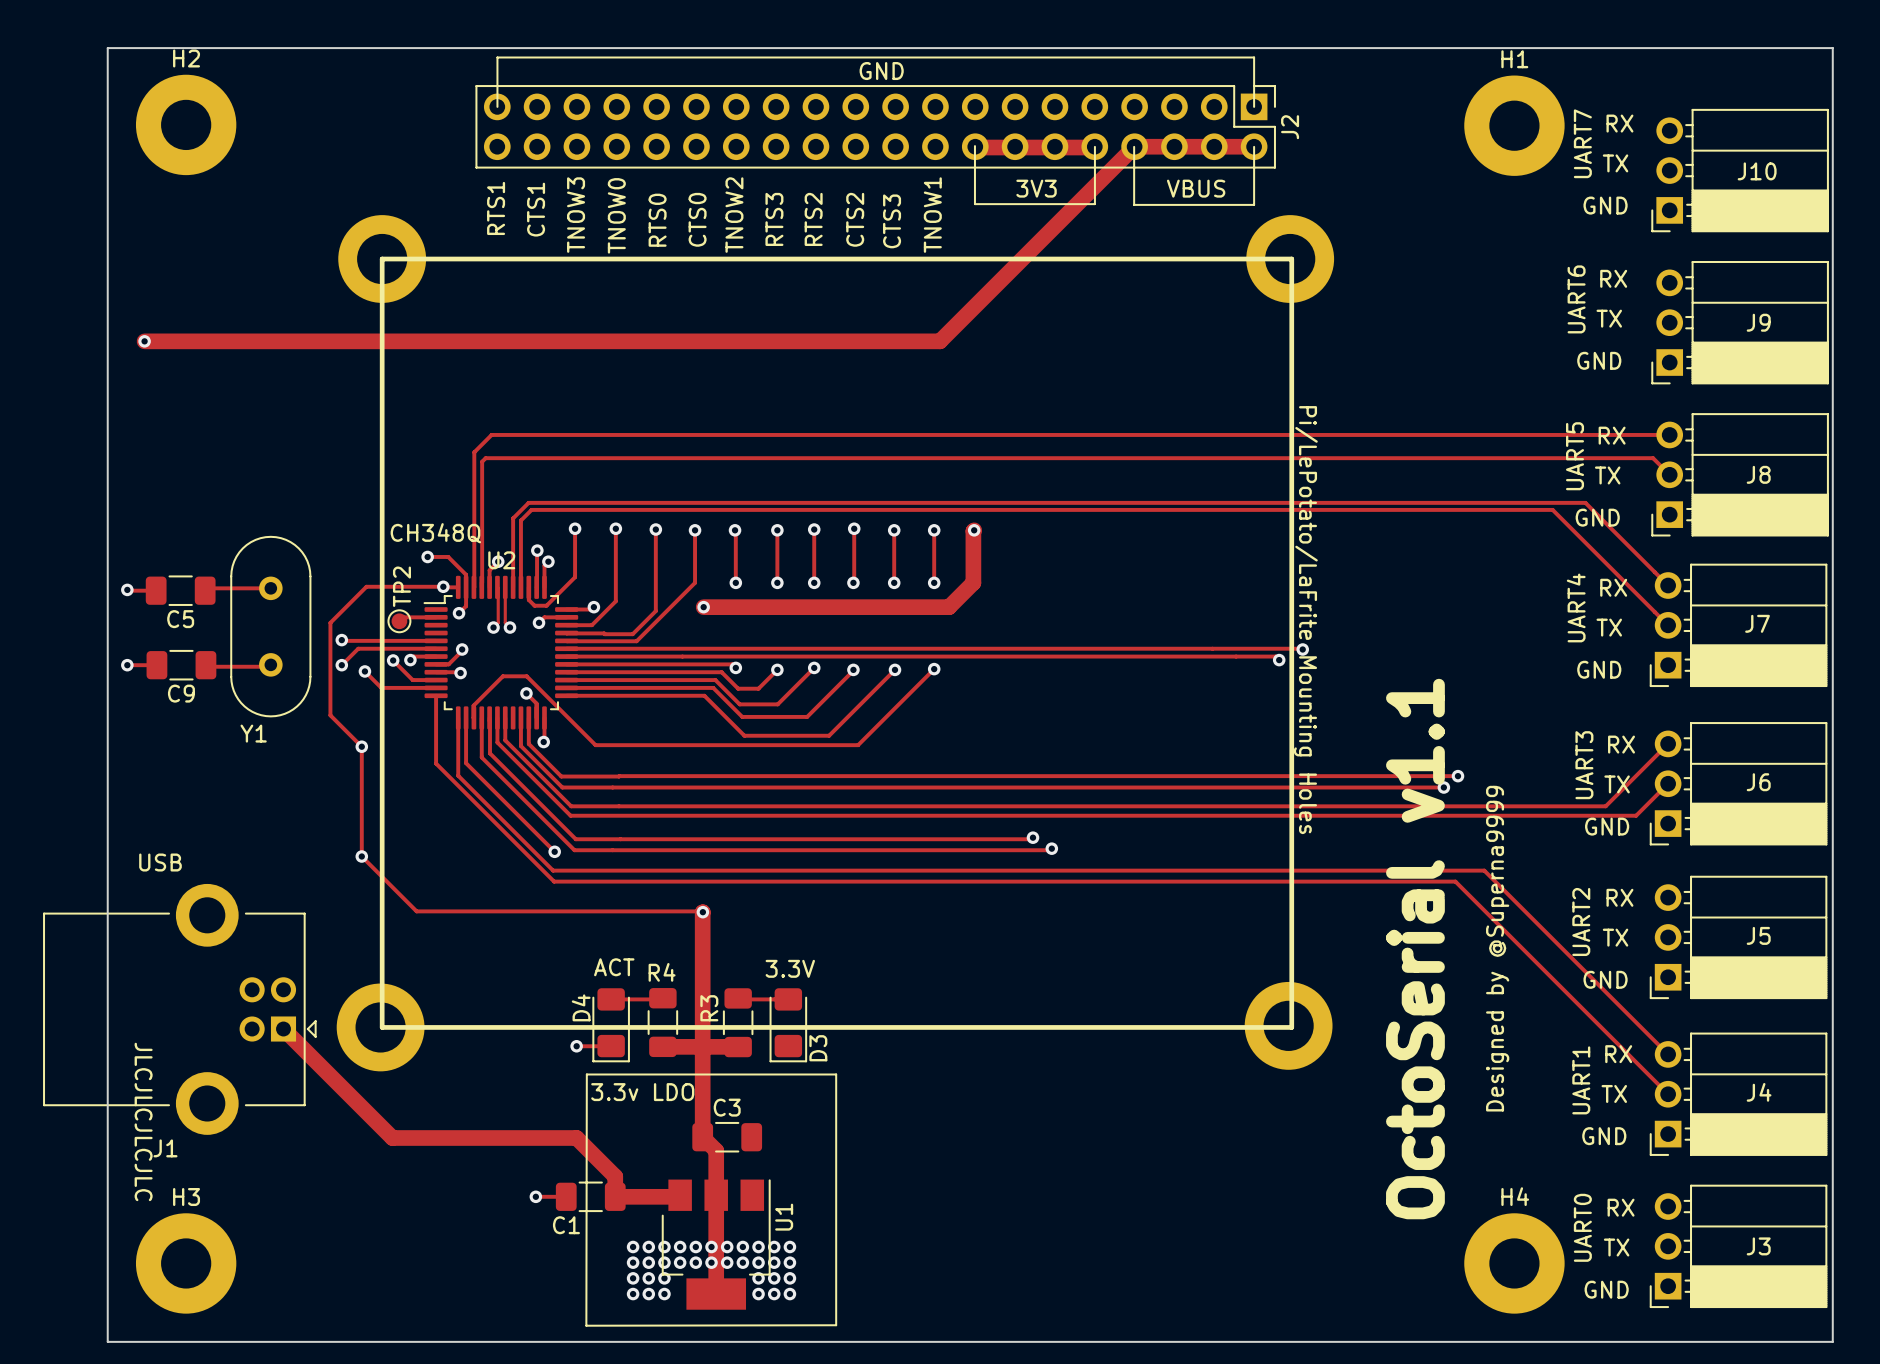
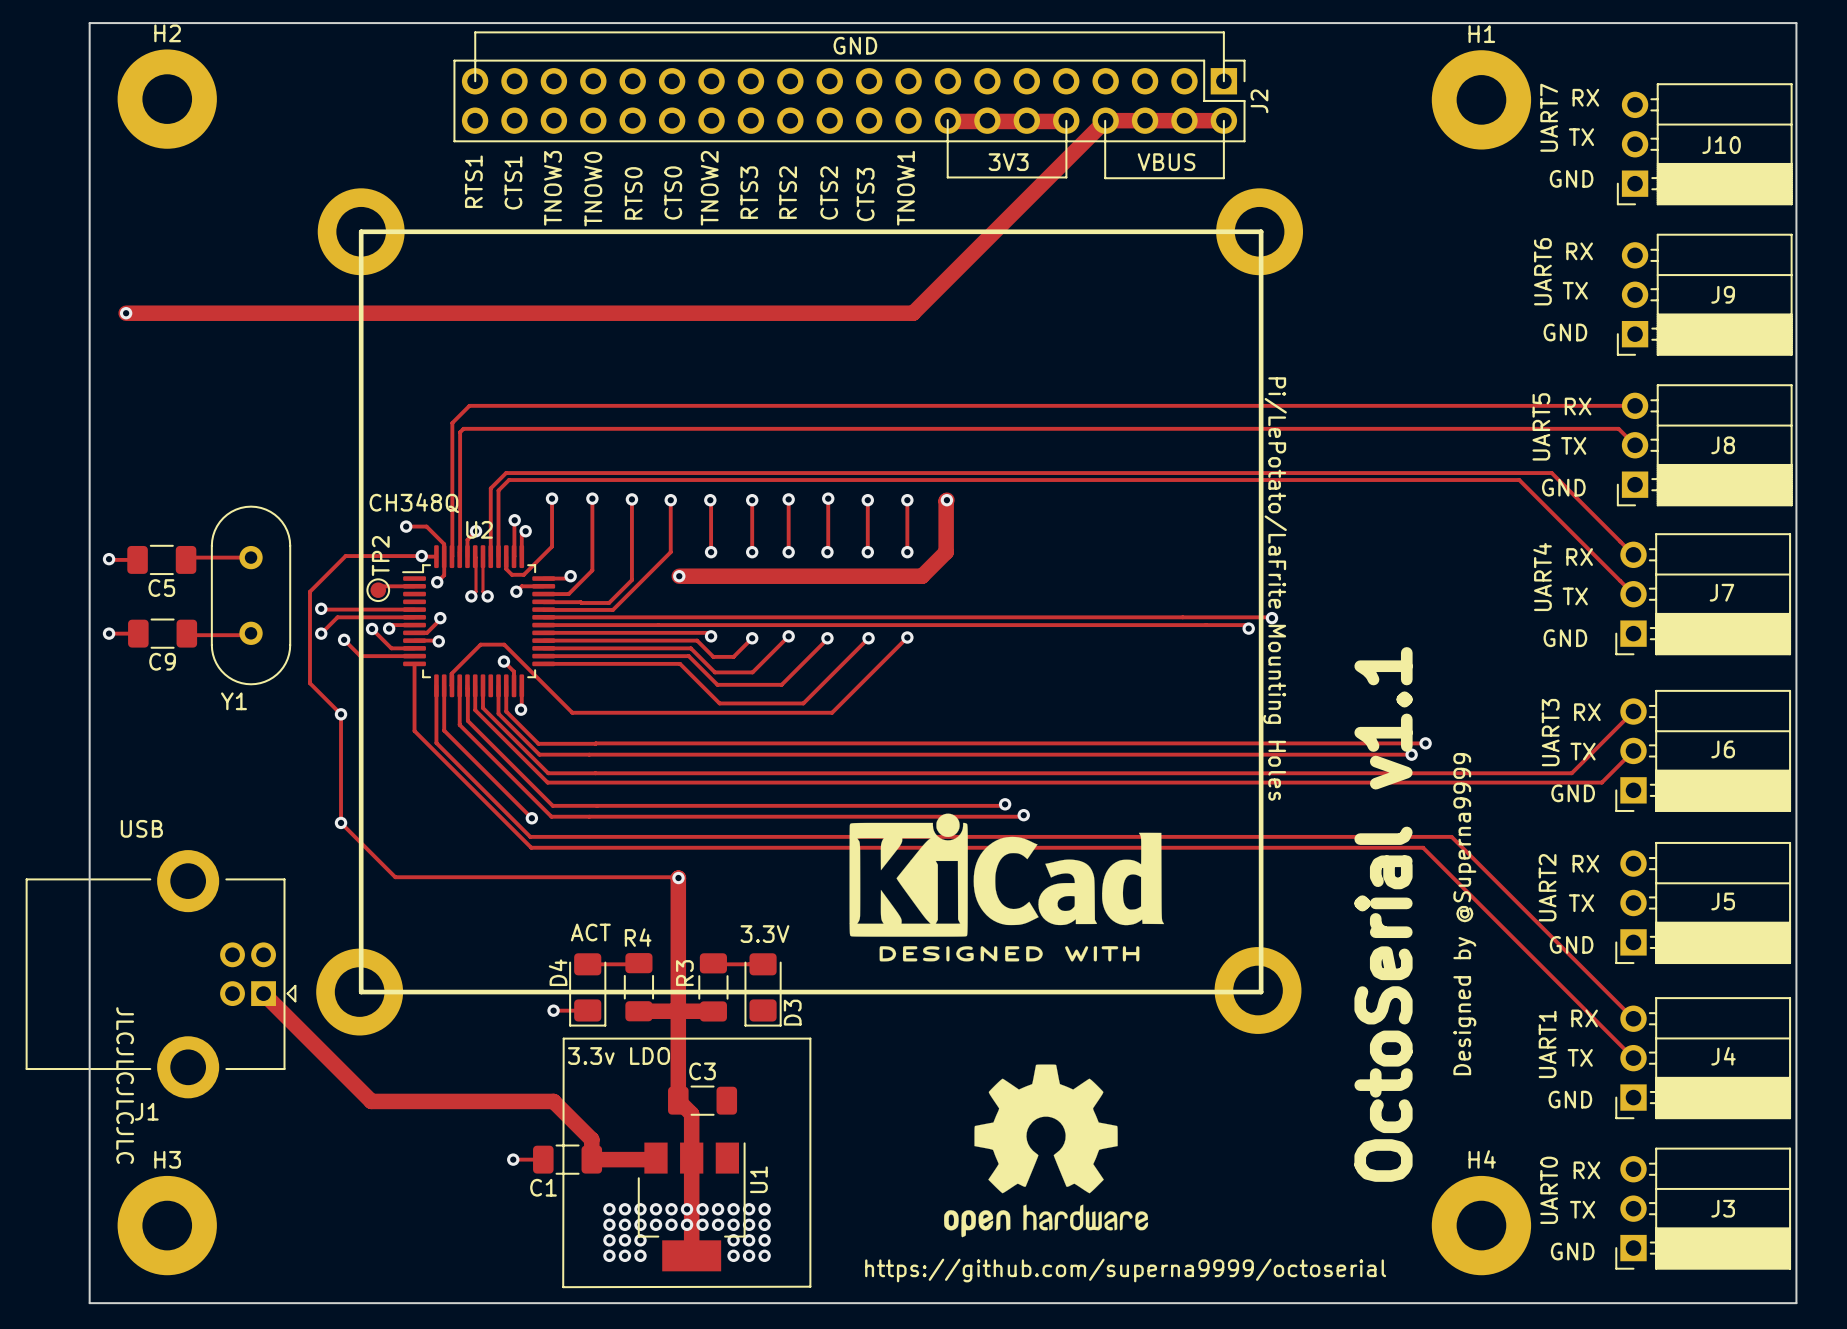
drawing: none -> [849, 813, 1165, 962]
drawing: none -> [944, 1064, 1149, 1238]
text: none -> https://github.com/superna9999/octoserial (1125, 1270)

